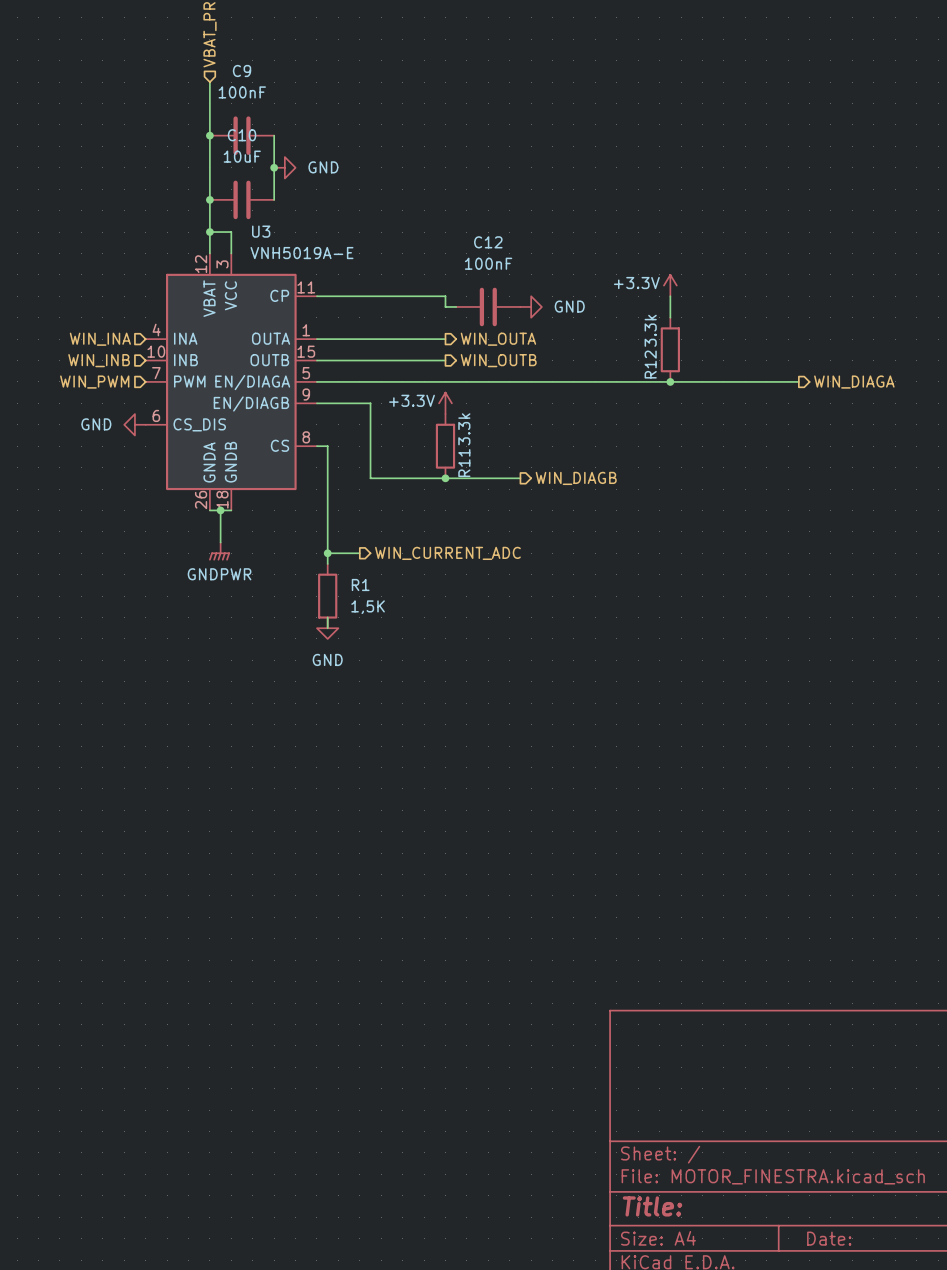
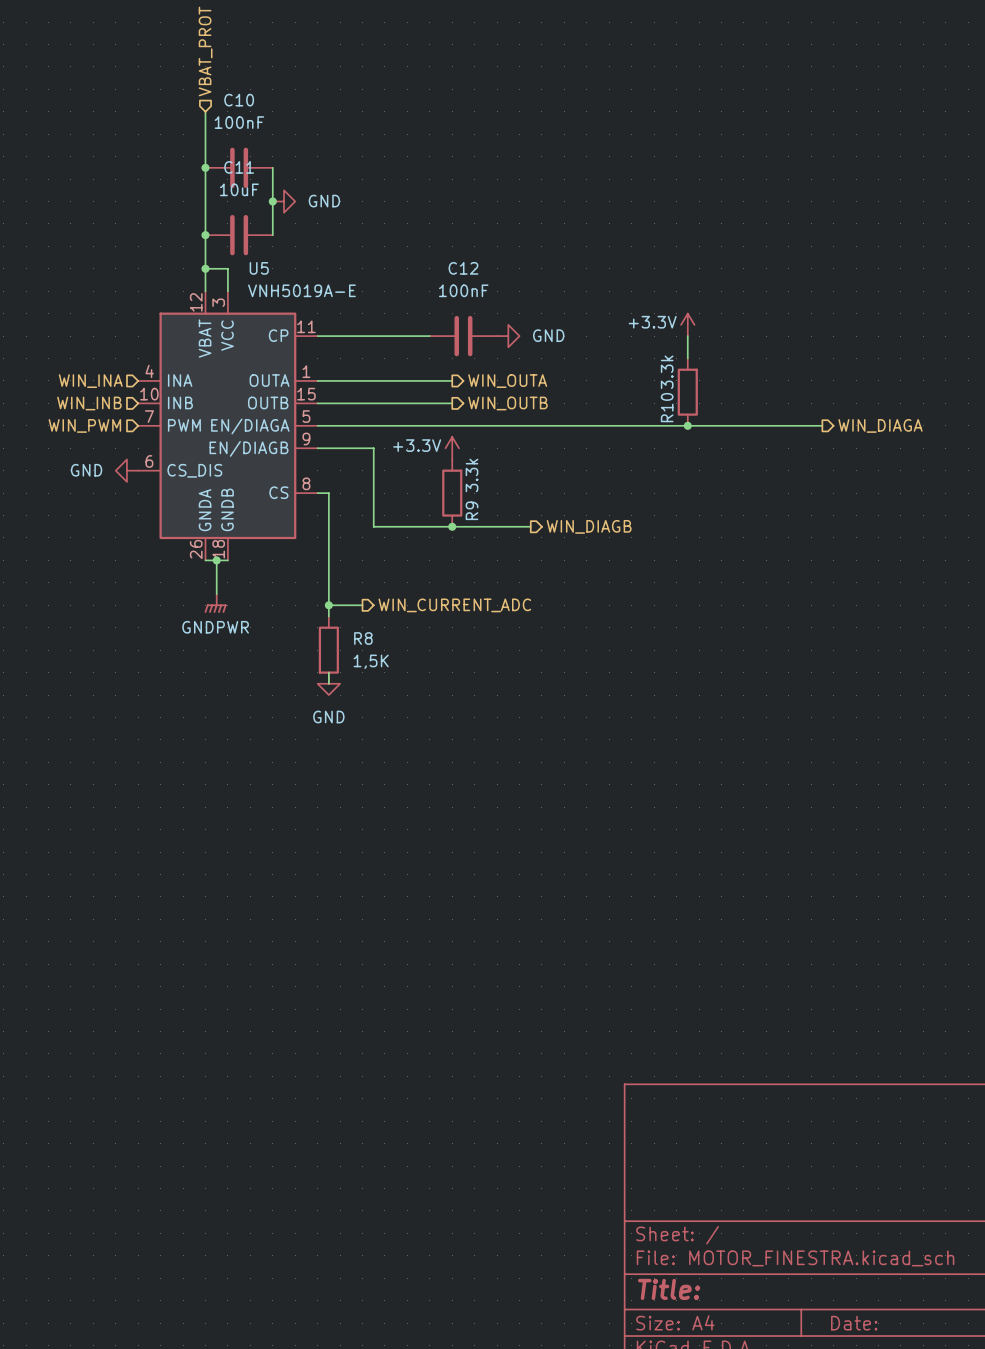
C9 name: C9 (242, 71) -> C10 (239, 100)
C10 name: C10 (242, 135) -> C11 (239, 167)
U3 name: U3 (261, 231) -> U5 (259, 268)
wire: (424, 296) (445, 296) (445, 306) (456, 306) -> none
C12 position: (488, 306) -> (463, 336)
power symbol position: GND (531, 306) -> GND (508, 336)
R12 name: R12 (650, 364) -> R10 (667, 407)
R11 name: R11 (464, 463) -> R9 (472, 510)
R1 name: R1 (360, 585) -> R8 (363, 638)

